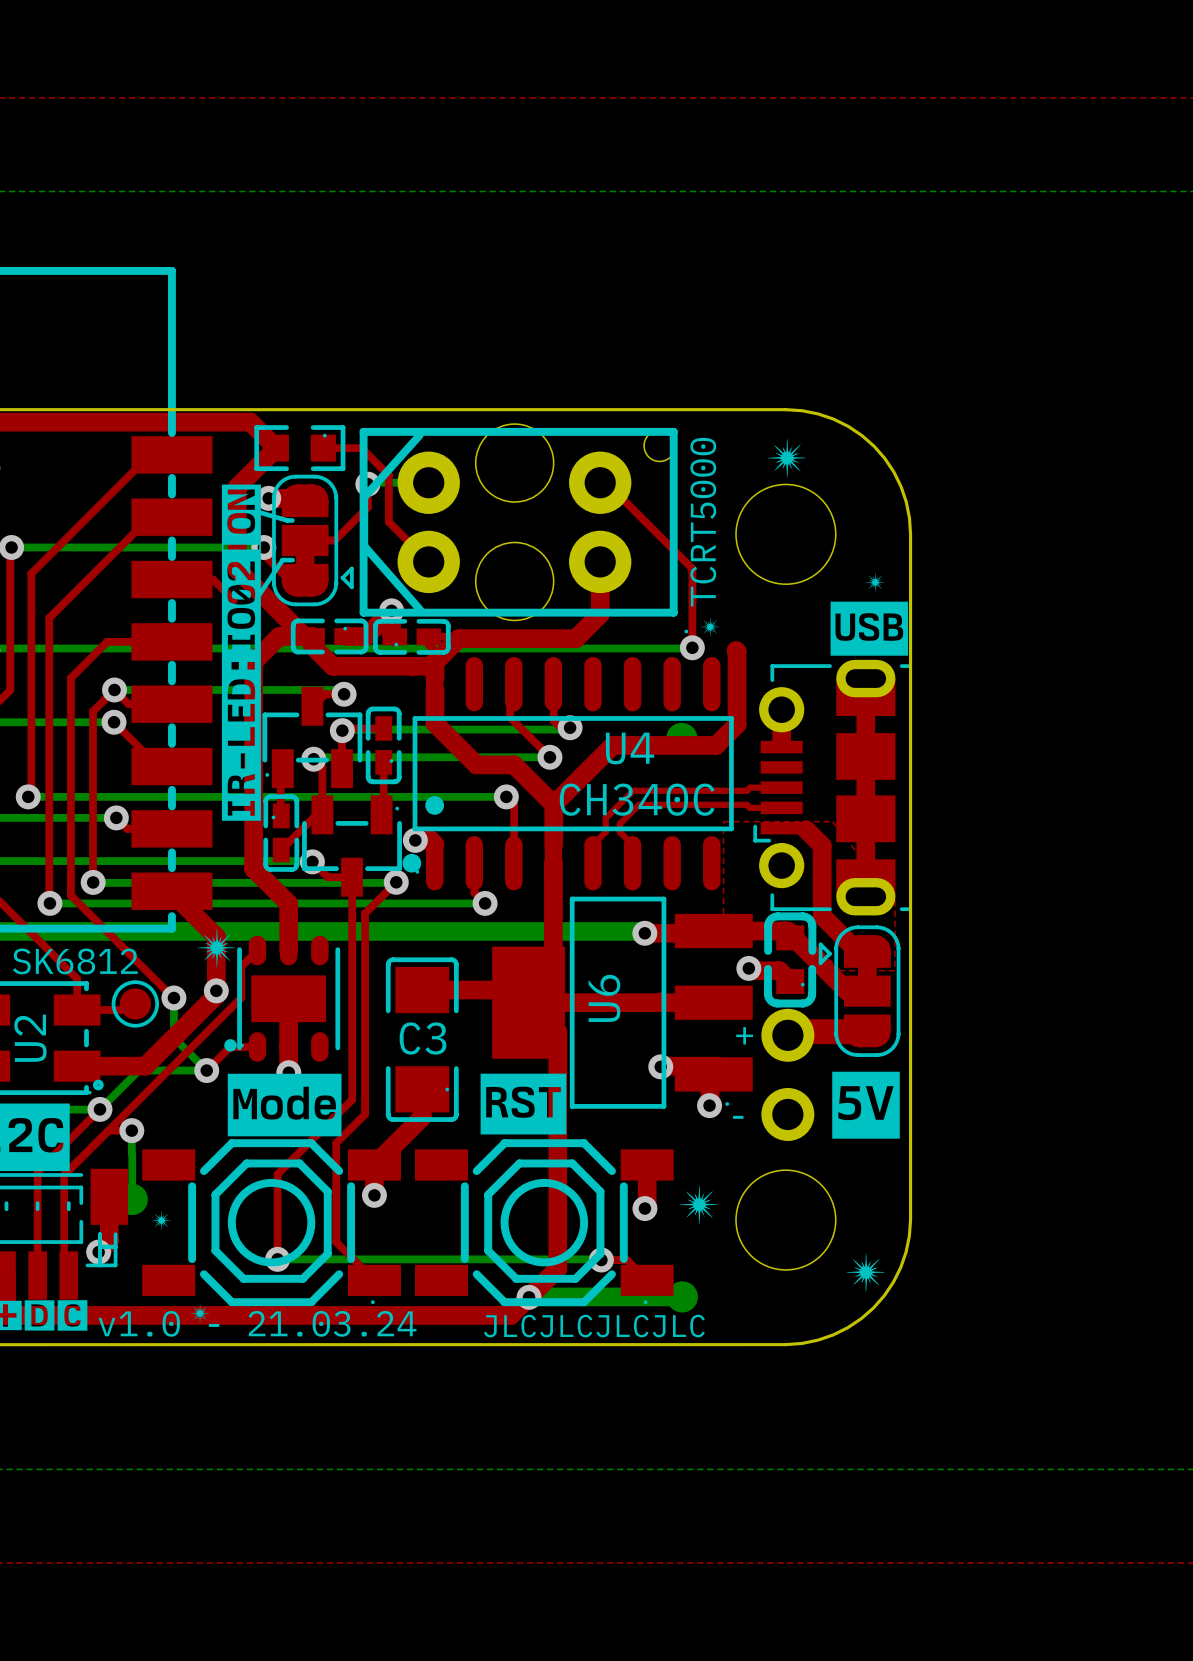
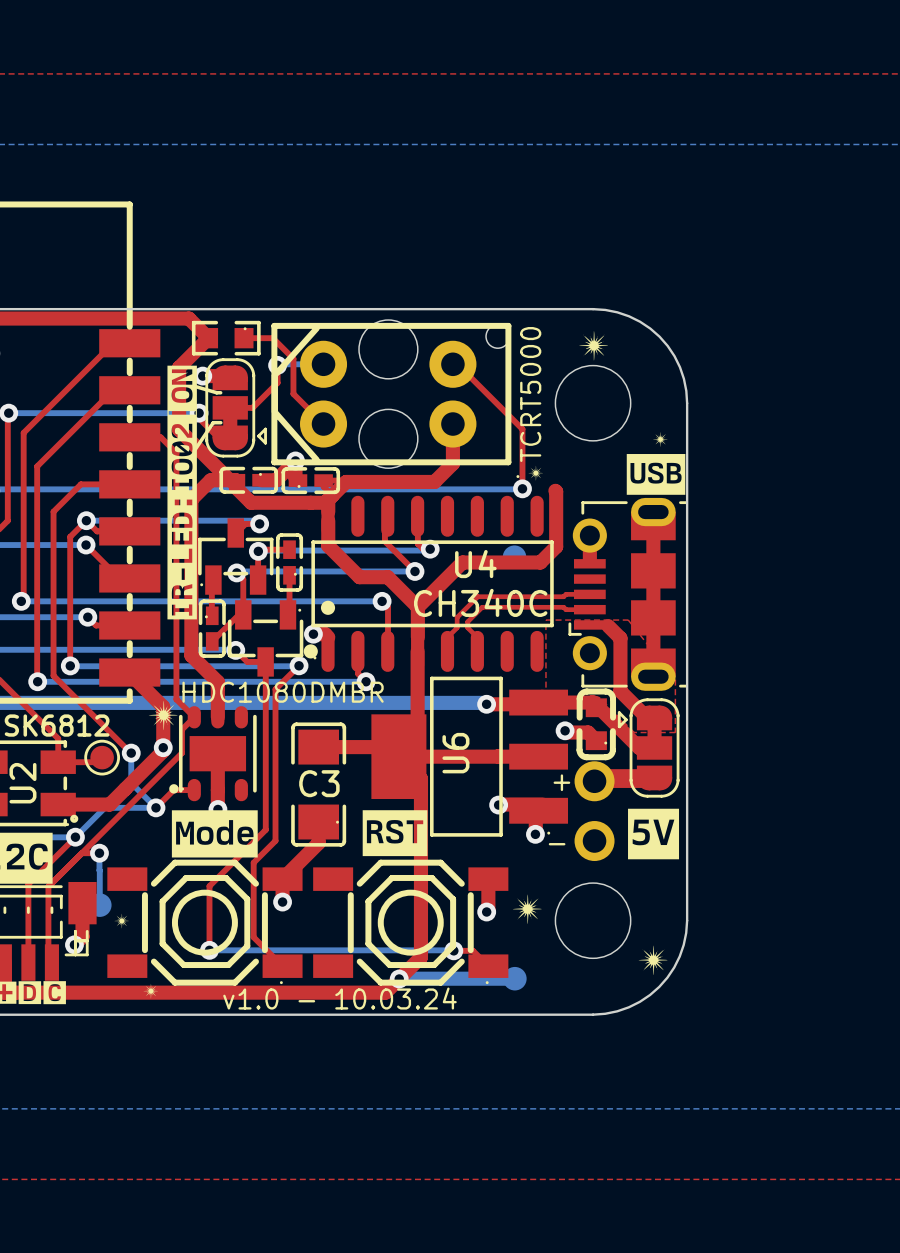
top track: none -> (176, 452) (176, 699) (194, 717)
part value: none -> HDC1080DMBR (283, 692)
text: v1.0 - 21.03.24 (257, 1323) -> v1.0 - 10.03.24 (339, 998)
text: JLCJLCJLCJLC (594, 1326) -> none

